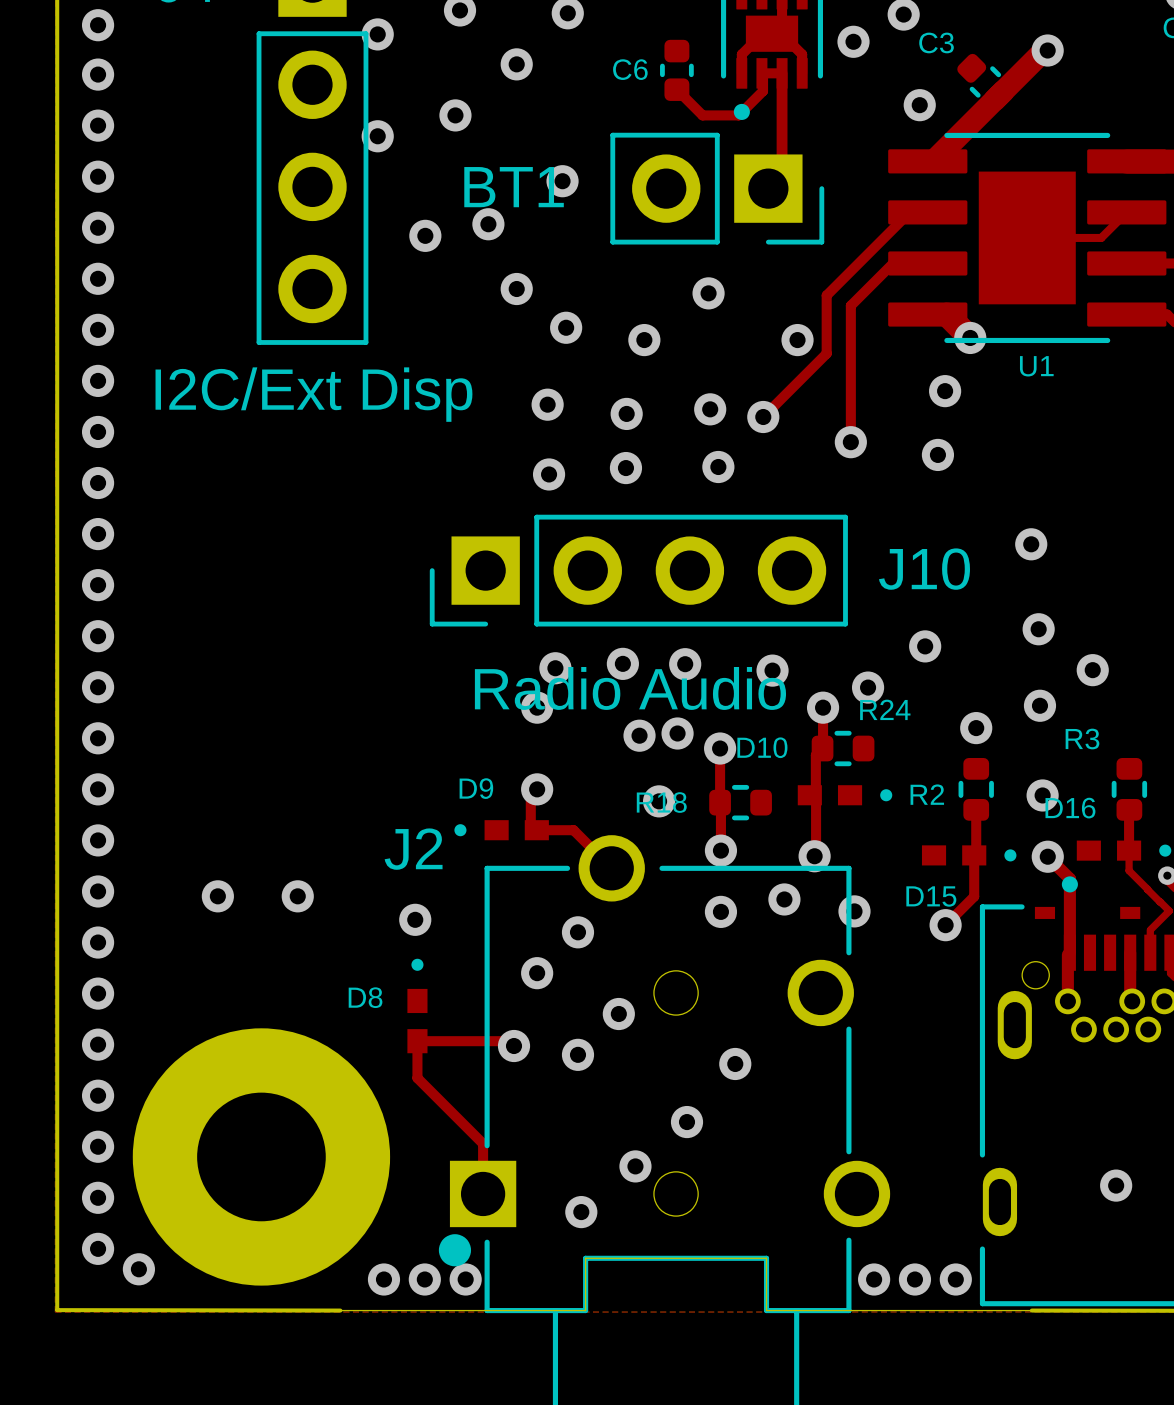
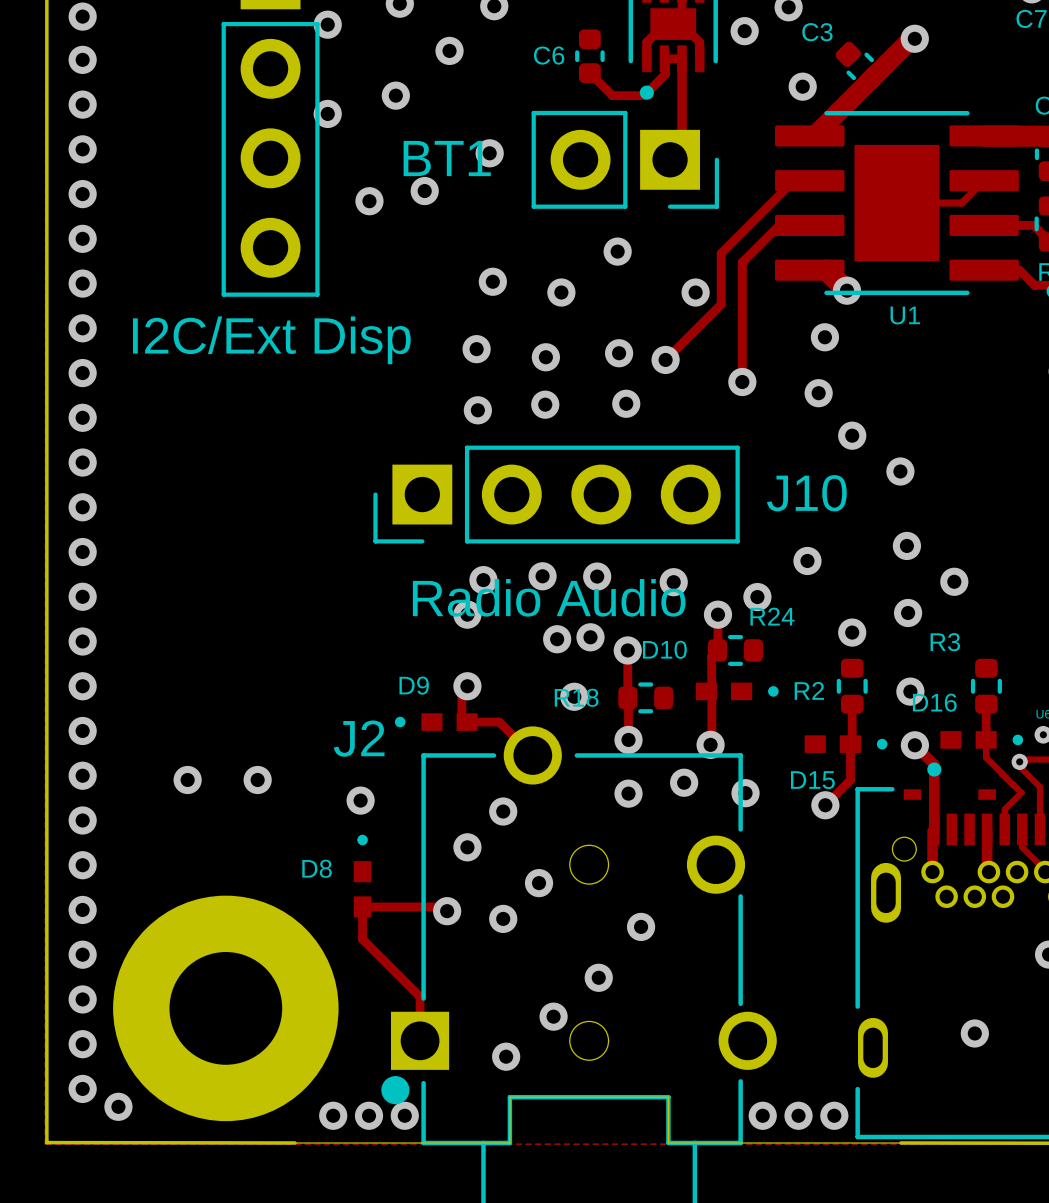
via: (516, 289) -> none
via: none -> (852, 435)

